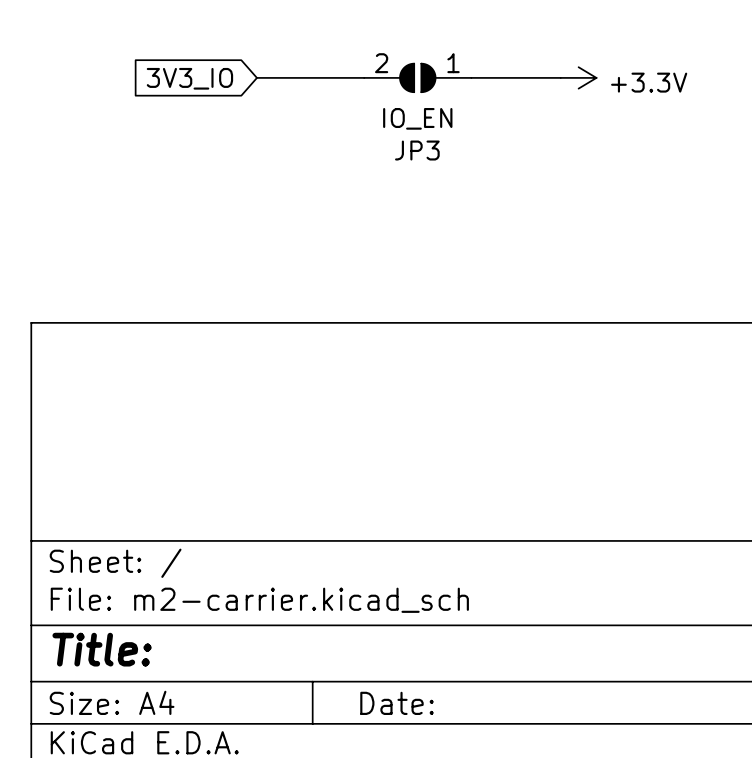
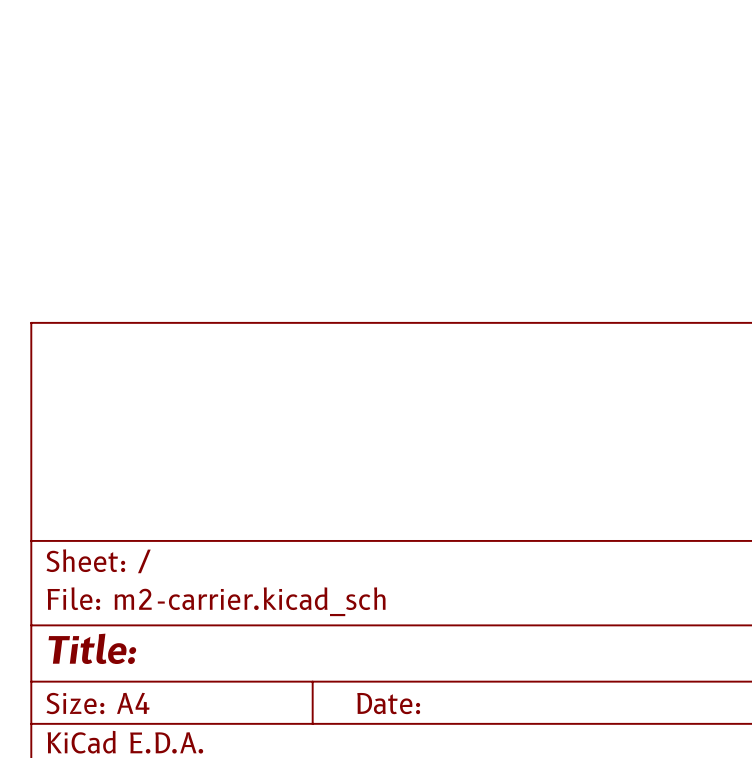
wire: (256, 77) (364, 77) -> none
JP3: IO_EN (417, 77) -> none
wire: (471, 77) (560, 77) -> none
power symbol: +3.3V (578, 77) -> none
global label: 3V3_IO (189, 78) -> none

